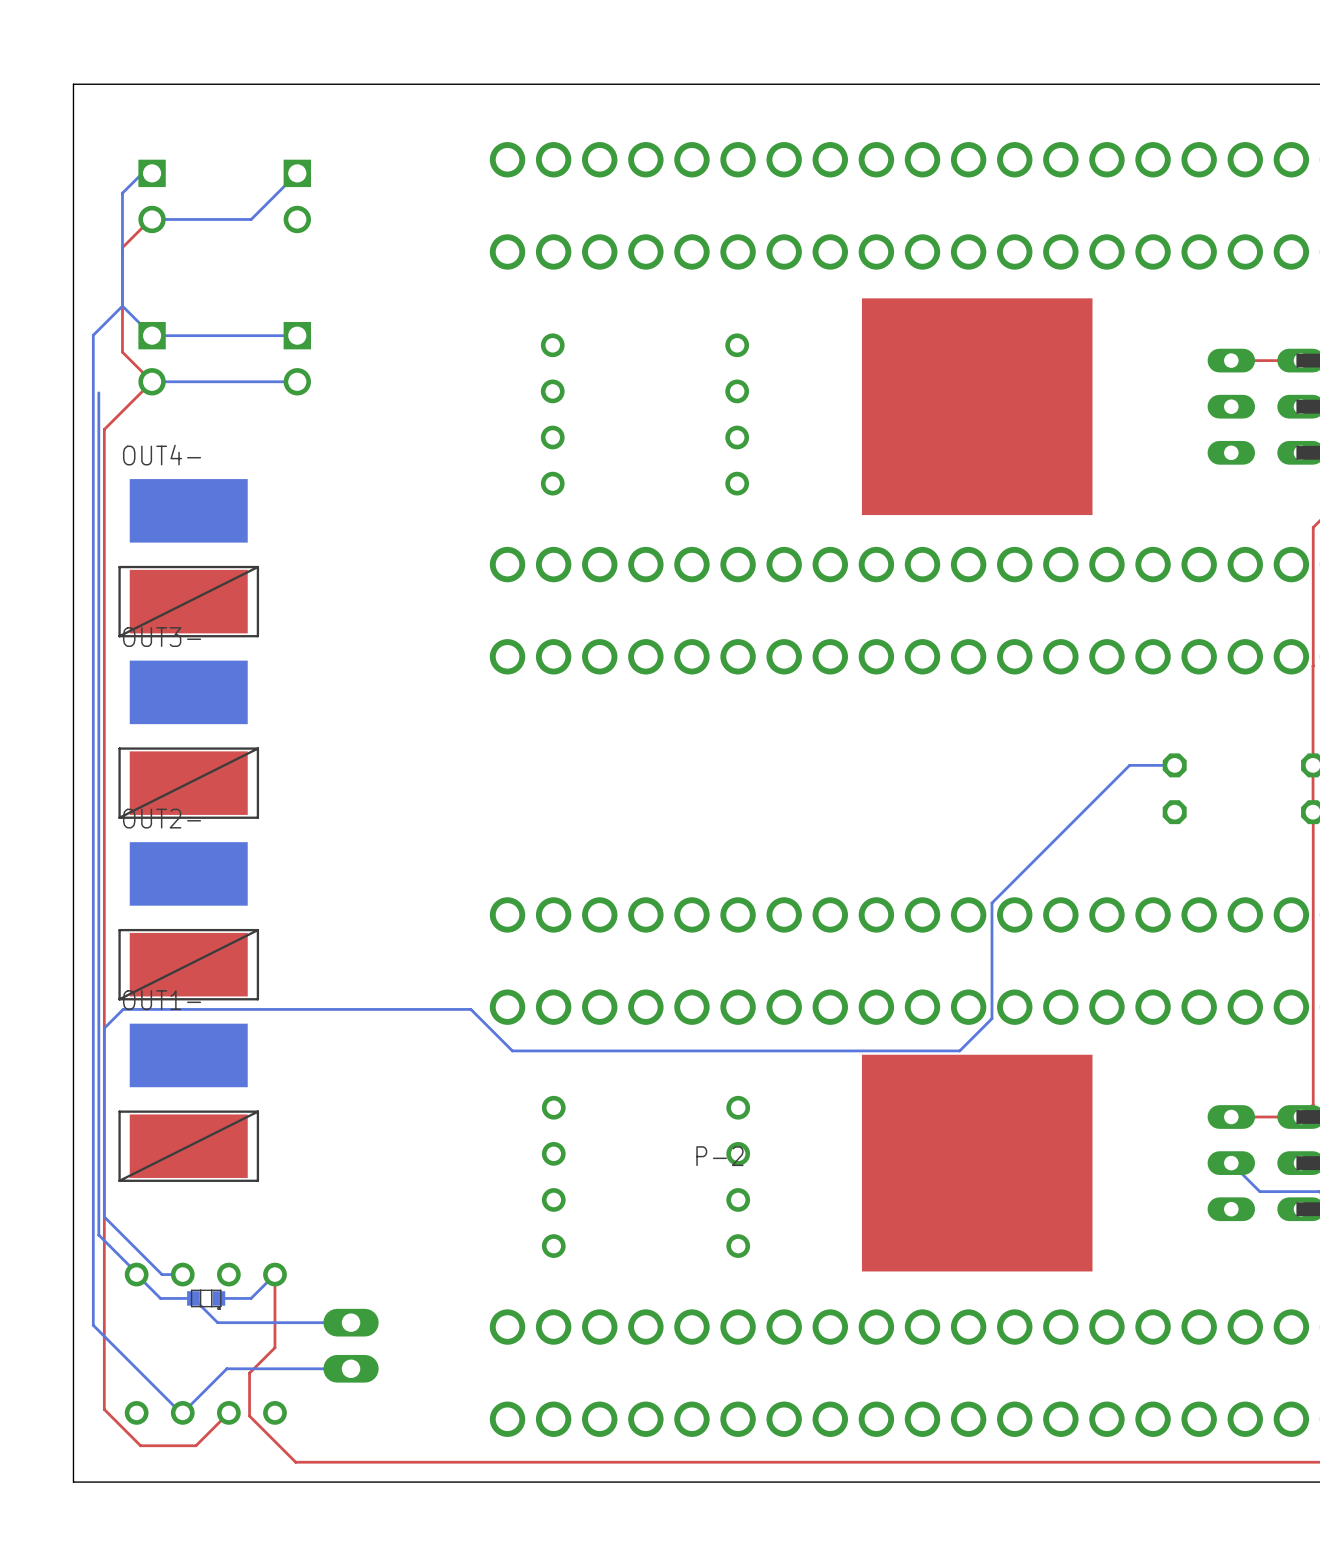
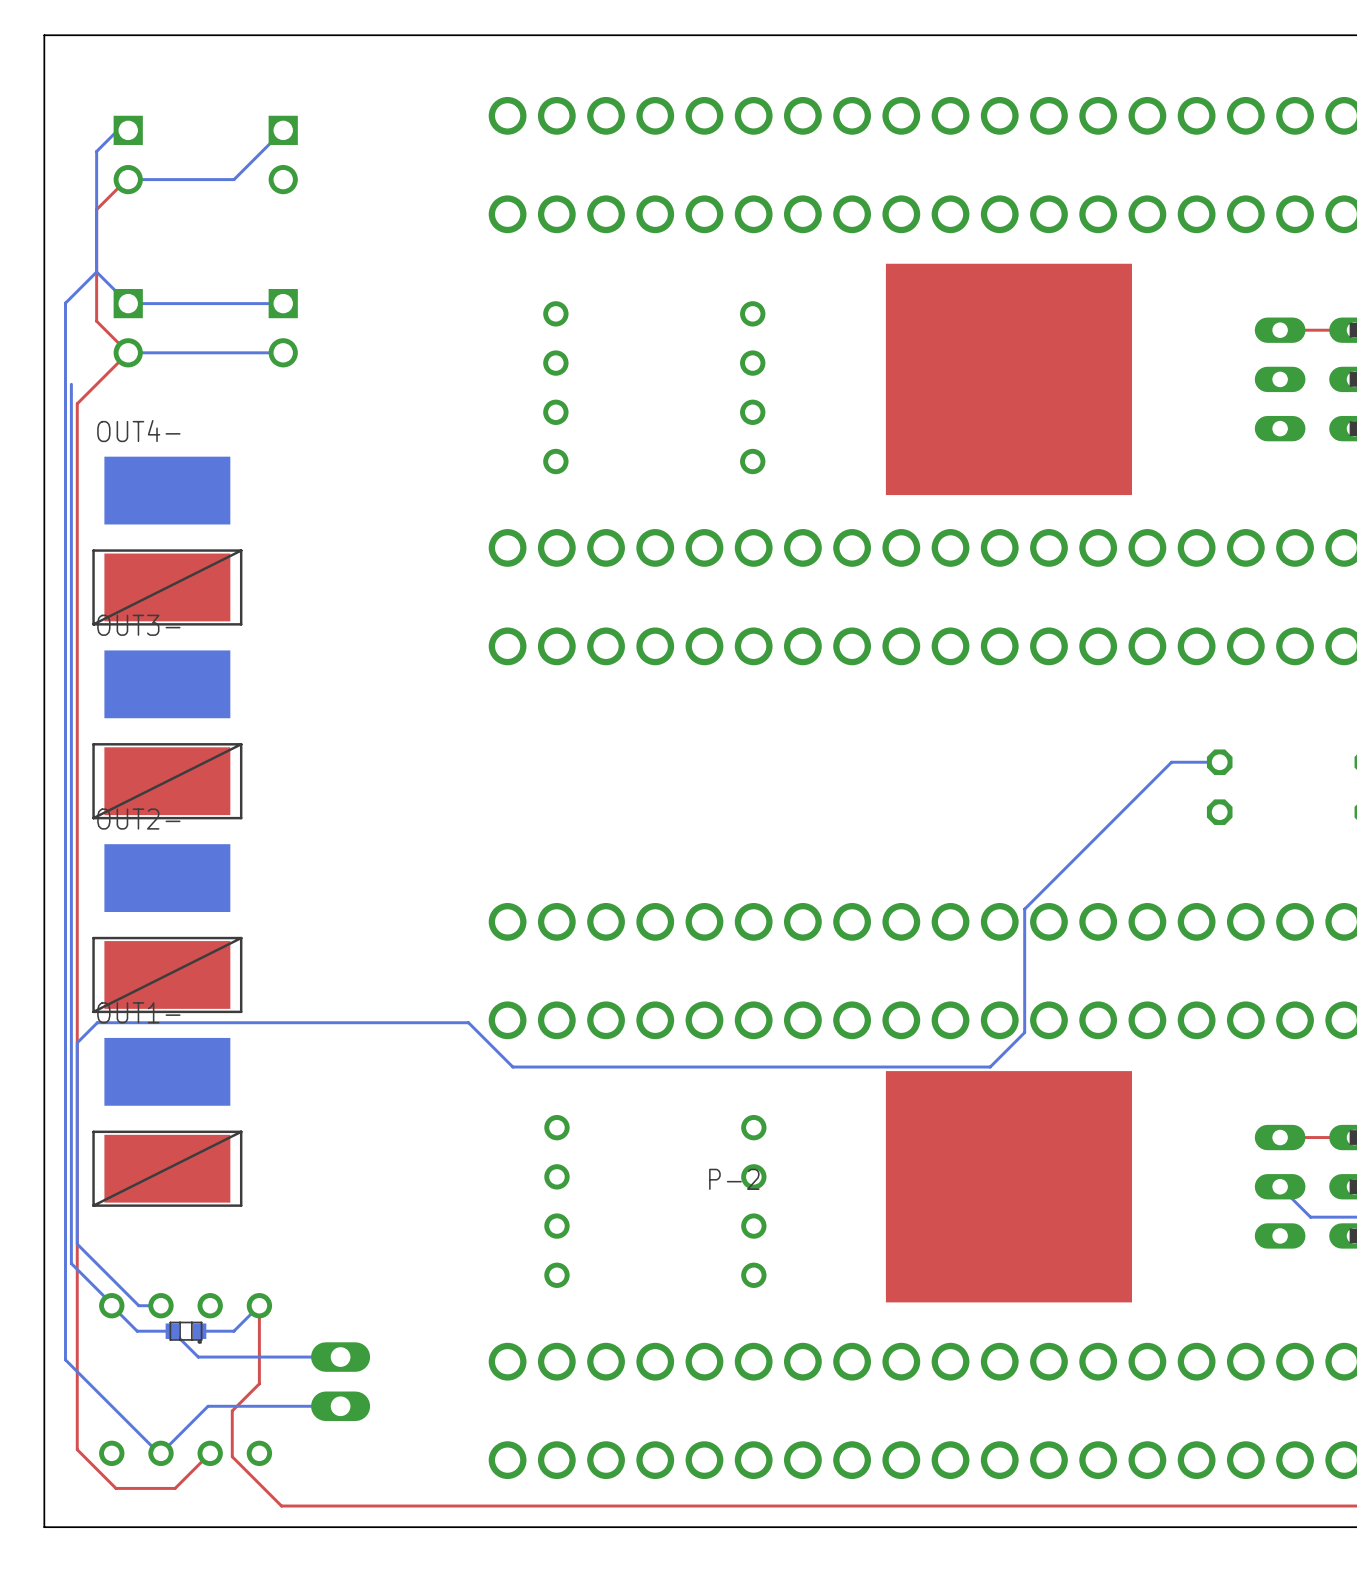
bottom track: (98, 392) (98, 411) -> none

